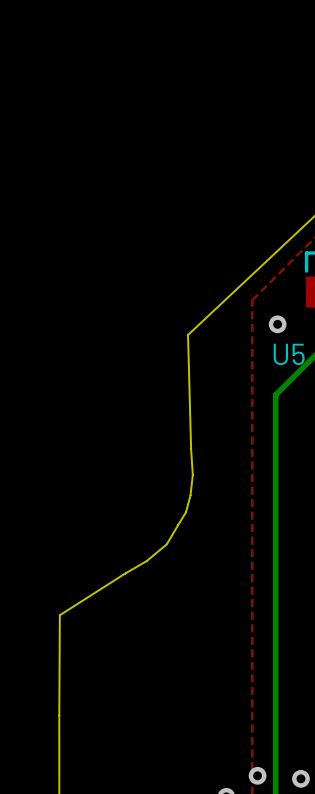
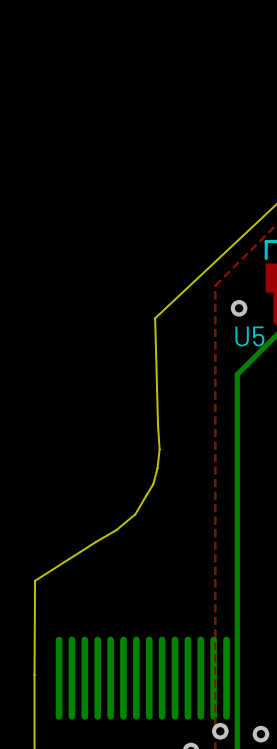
part: none -> (142, 678)

